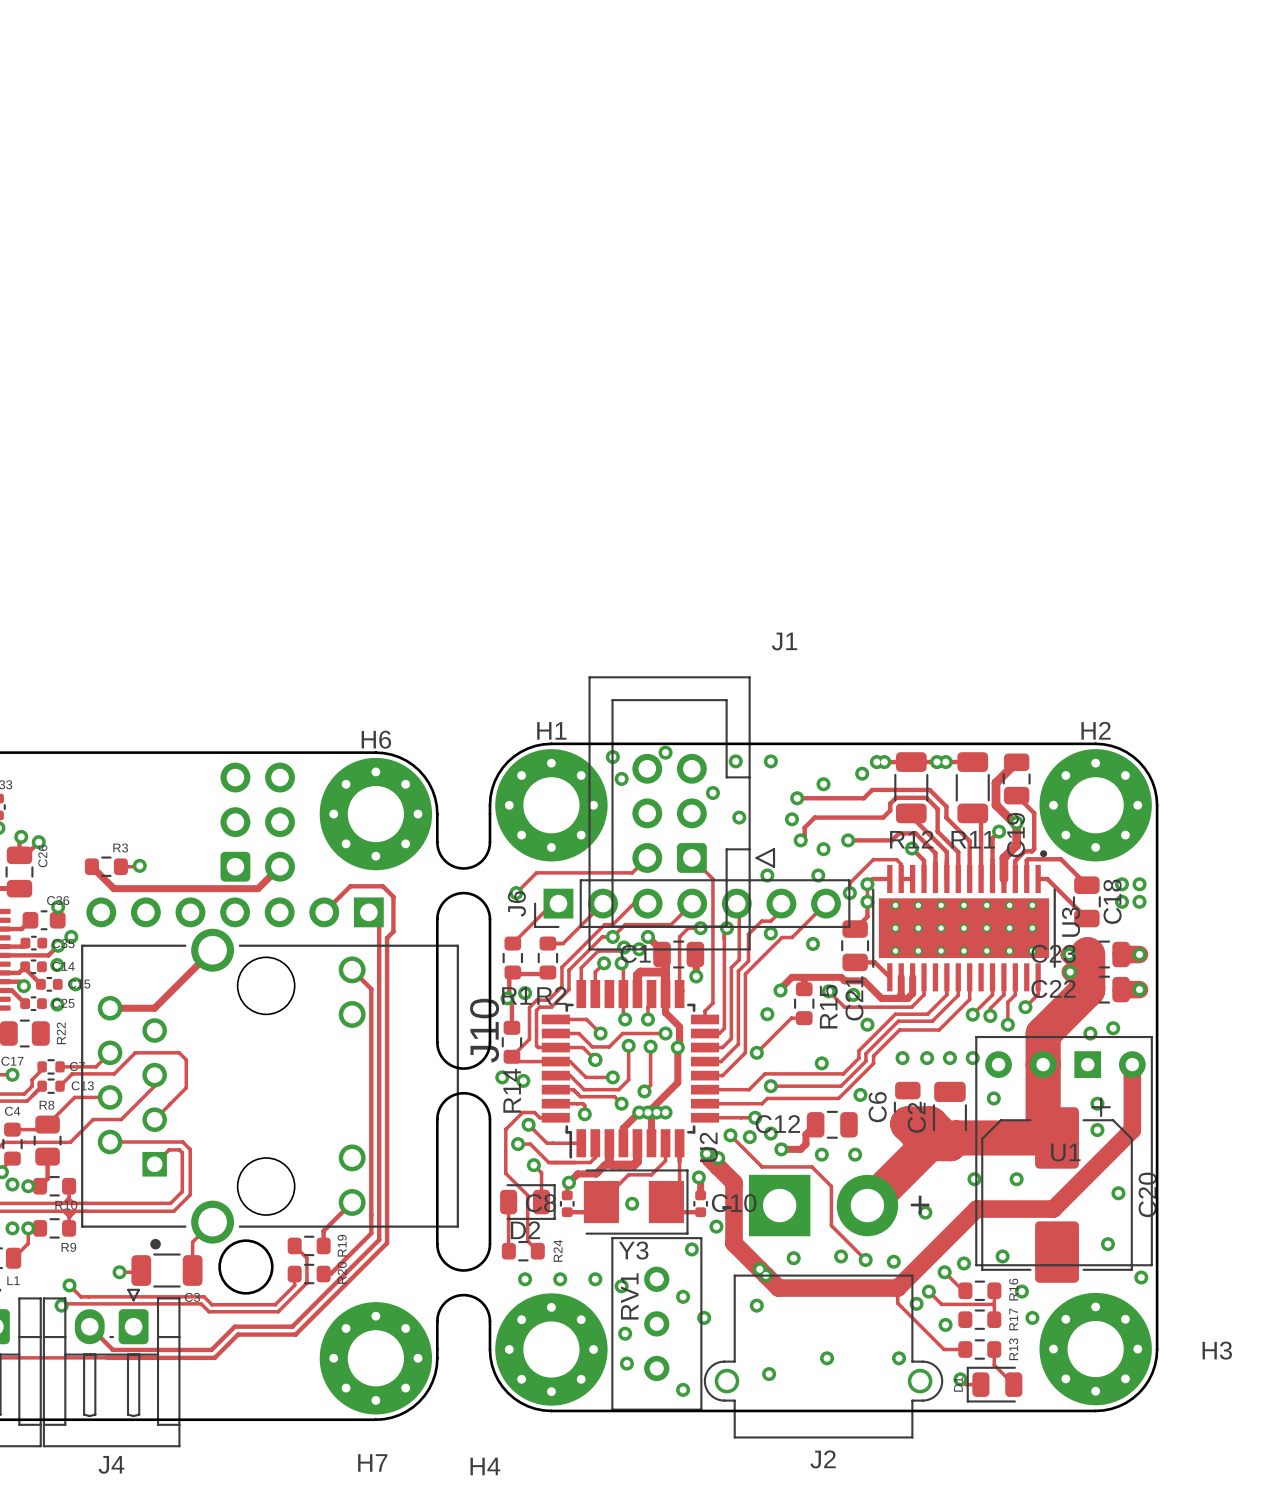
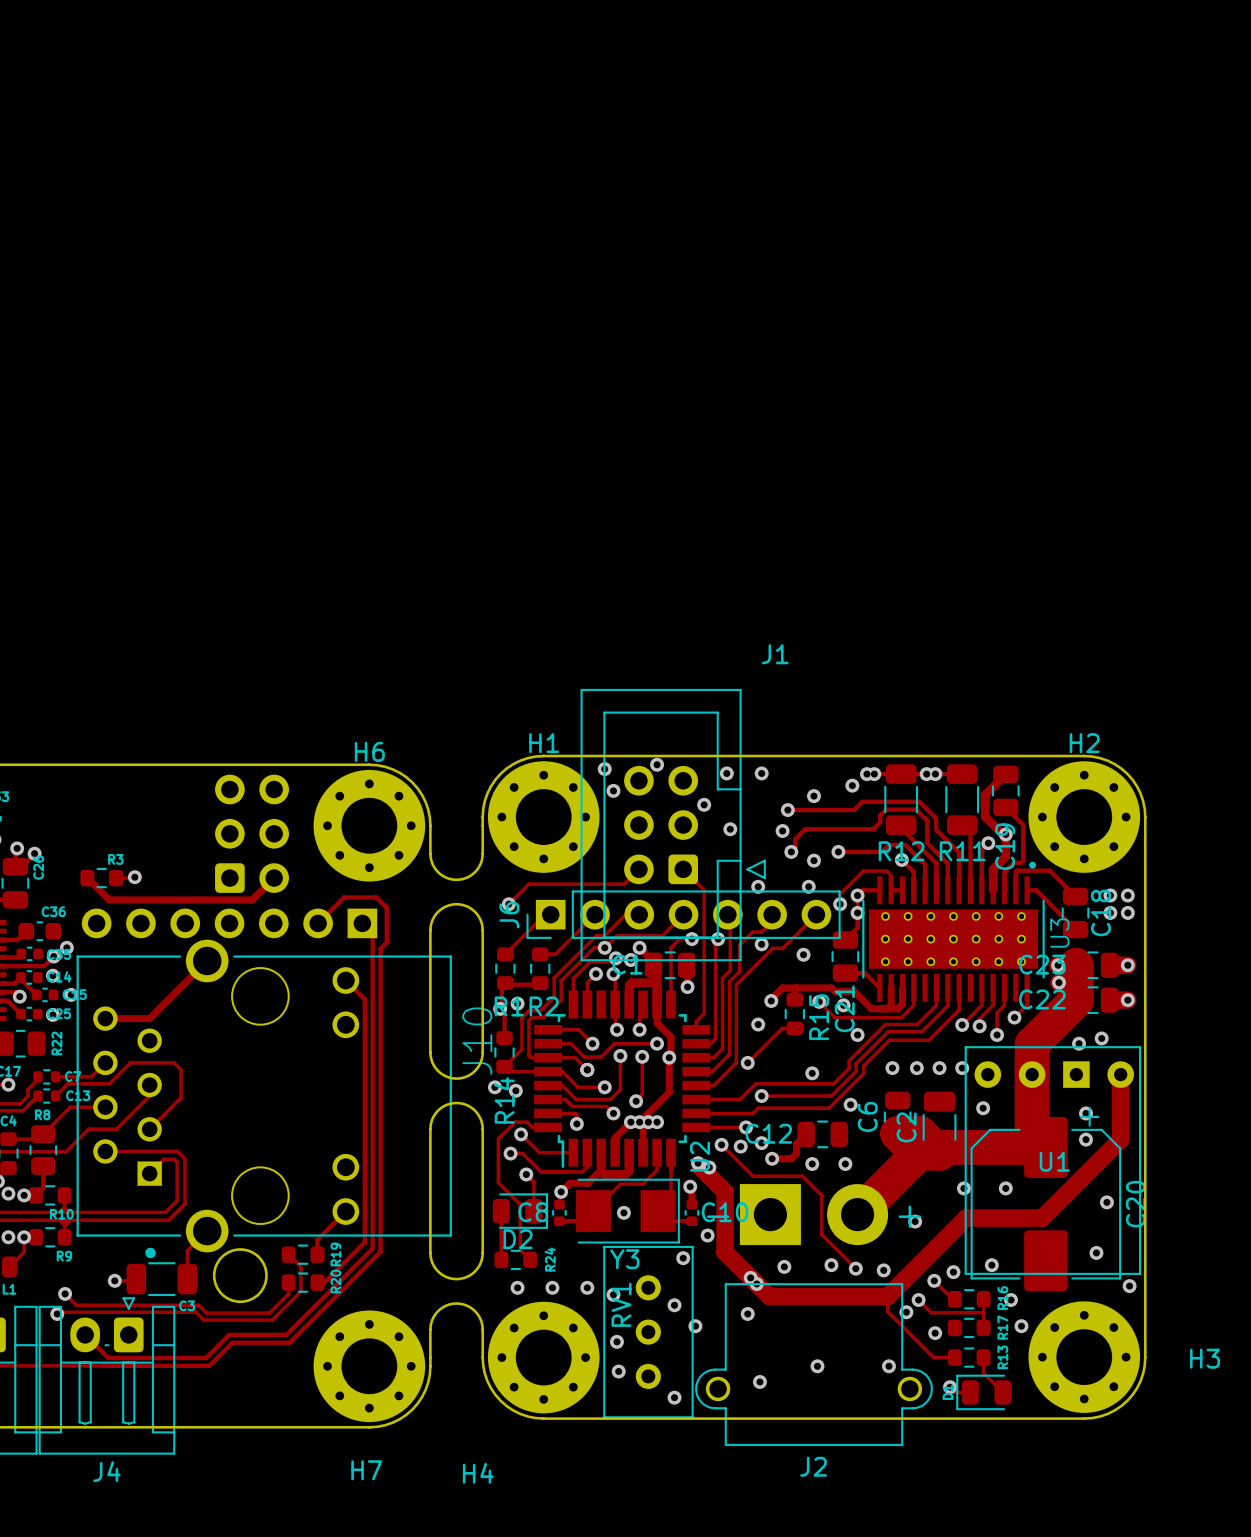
via: (58, 907) -> none

